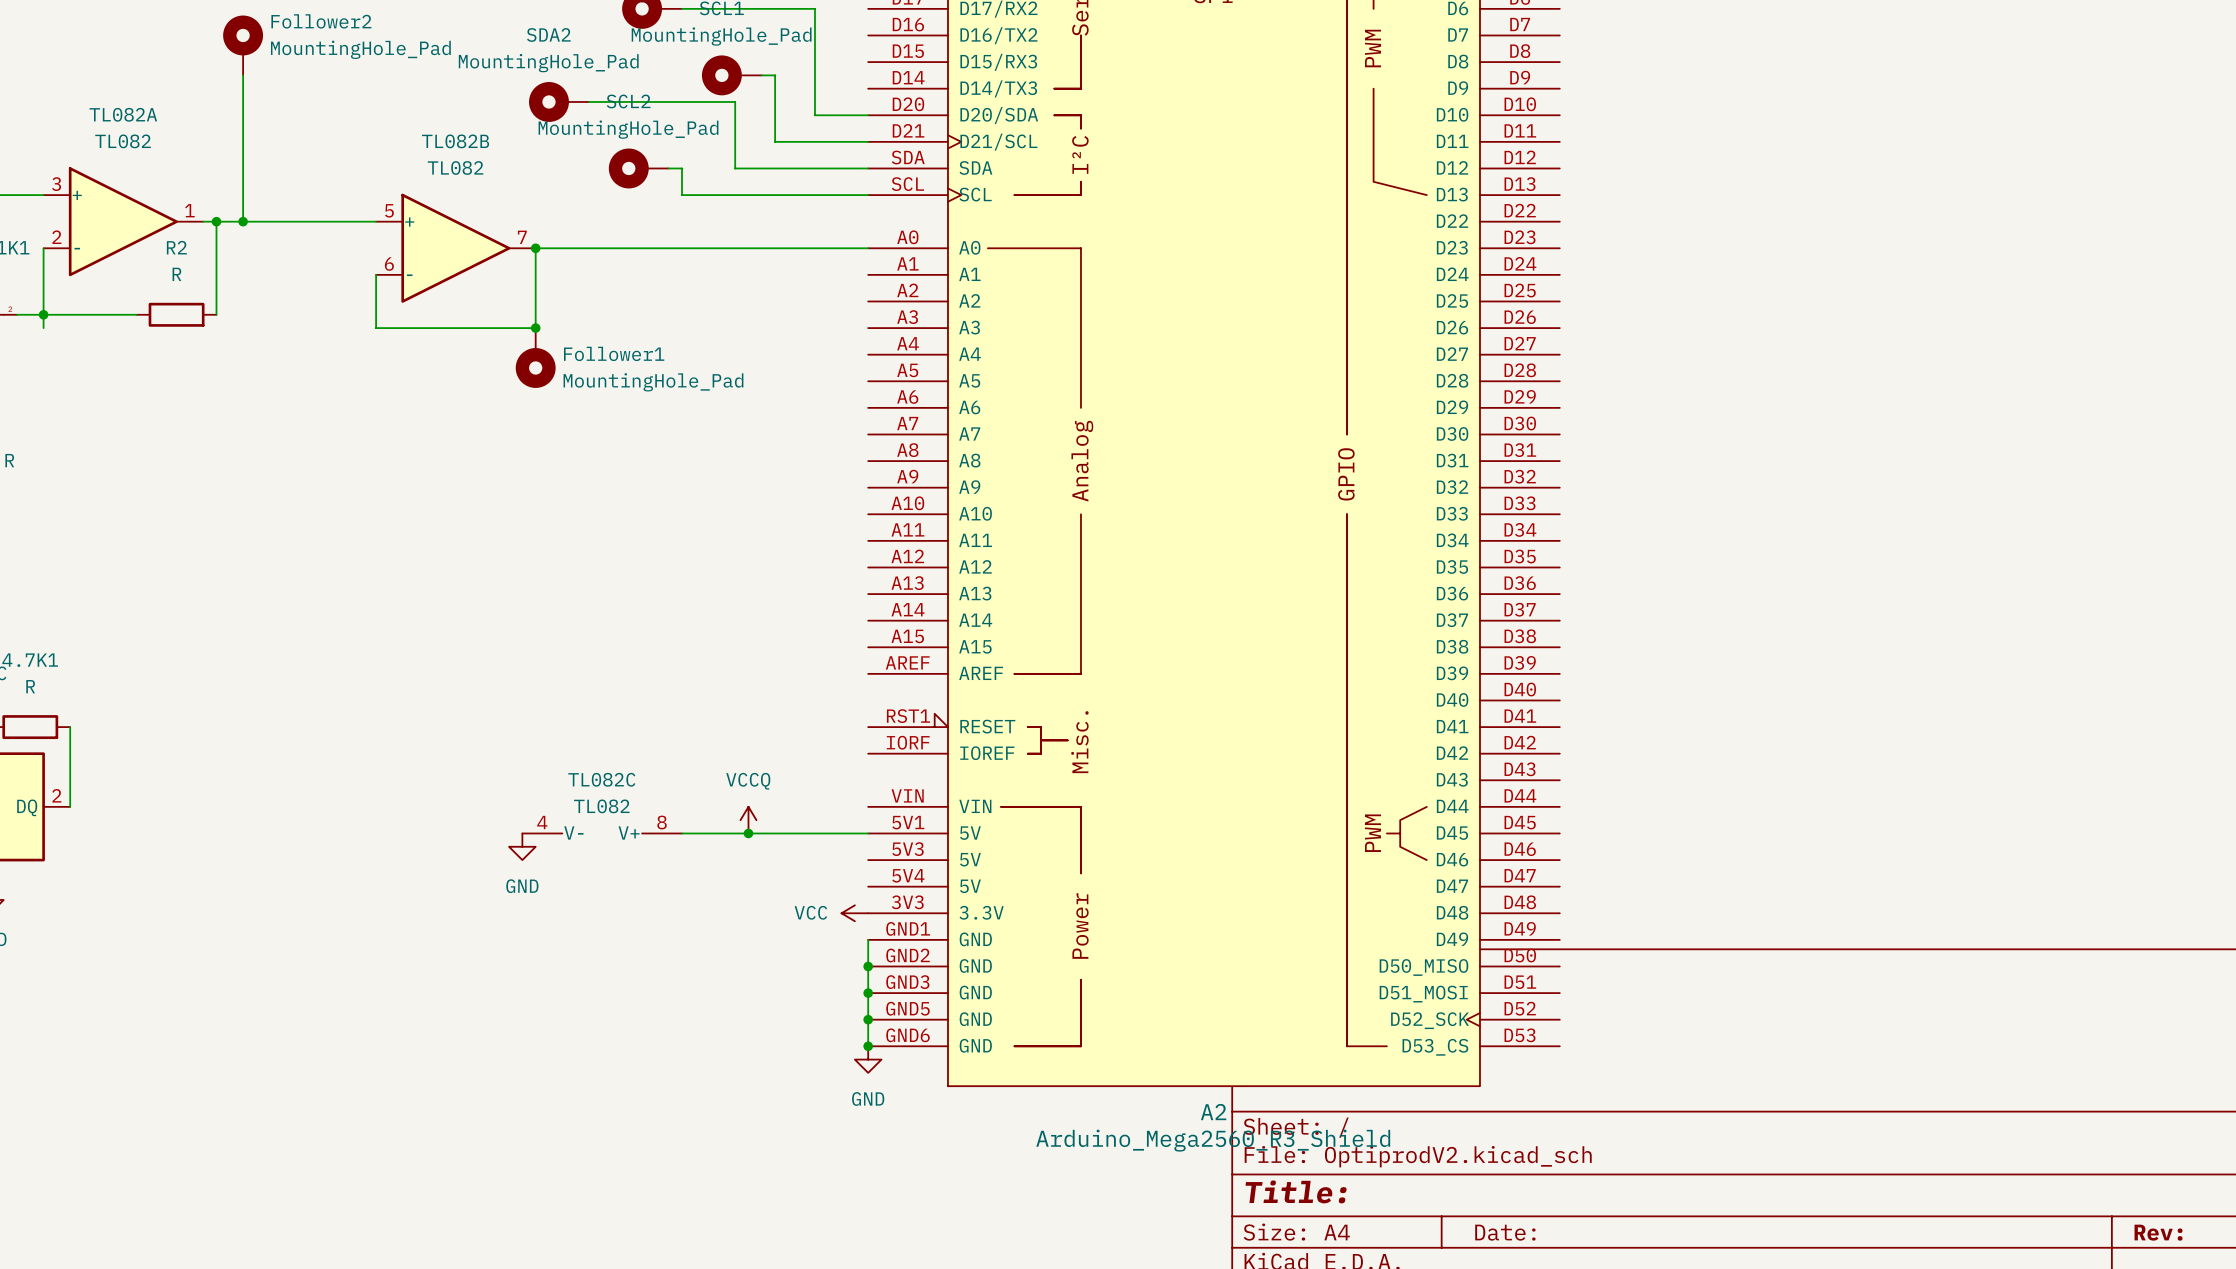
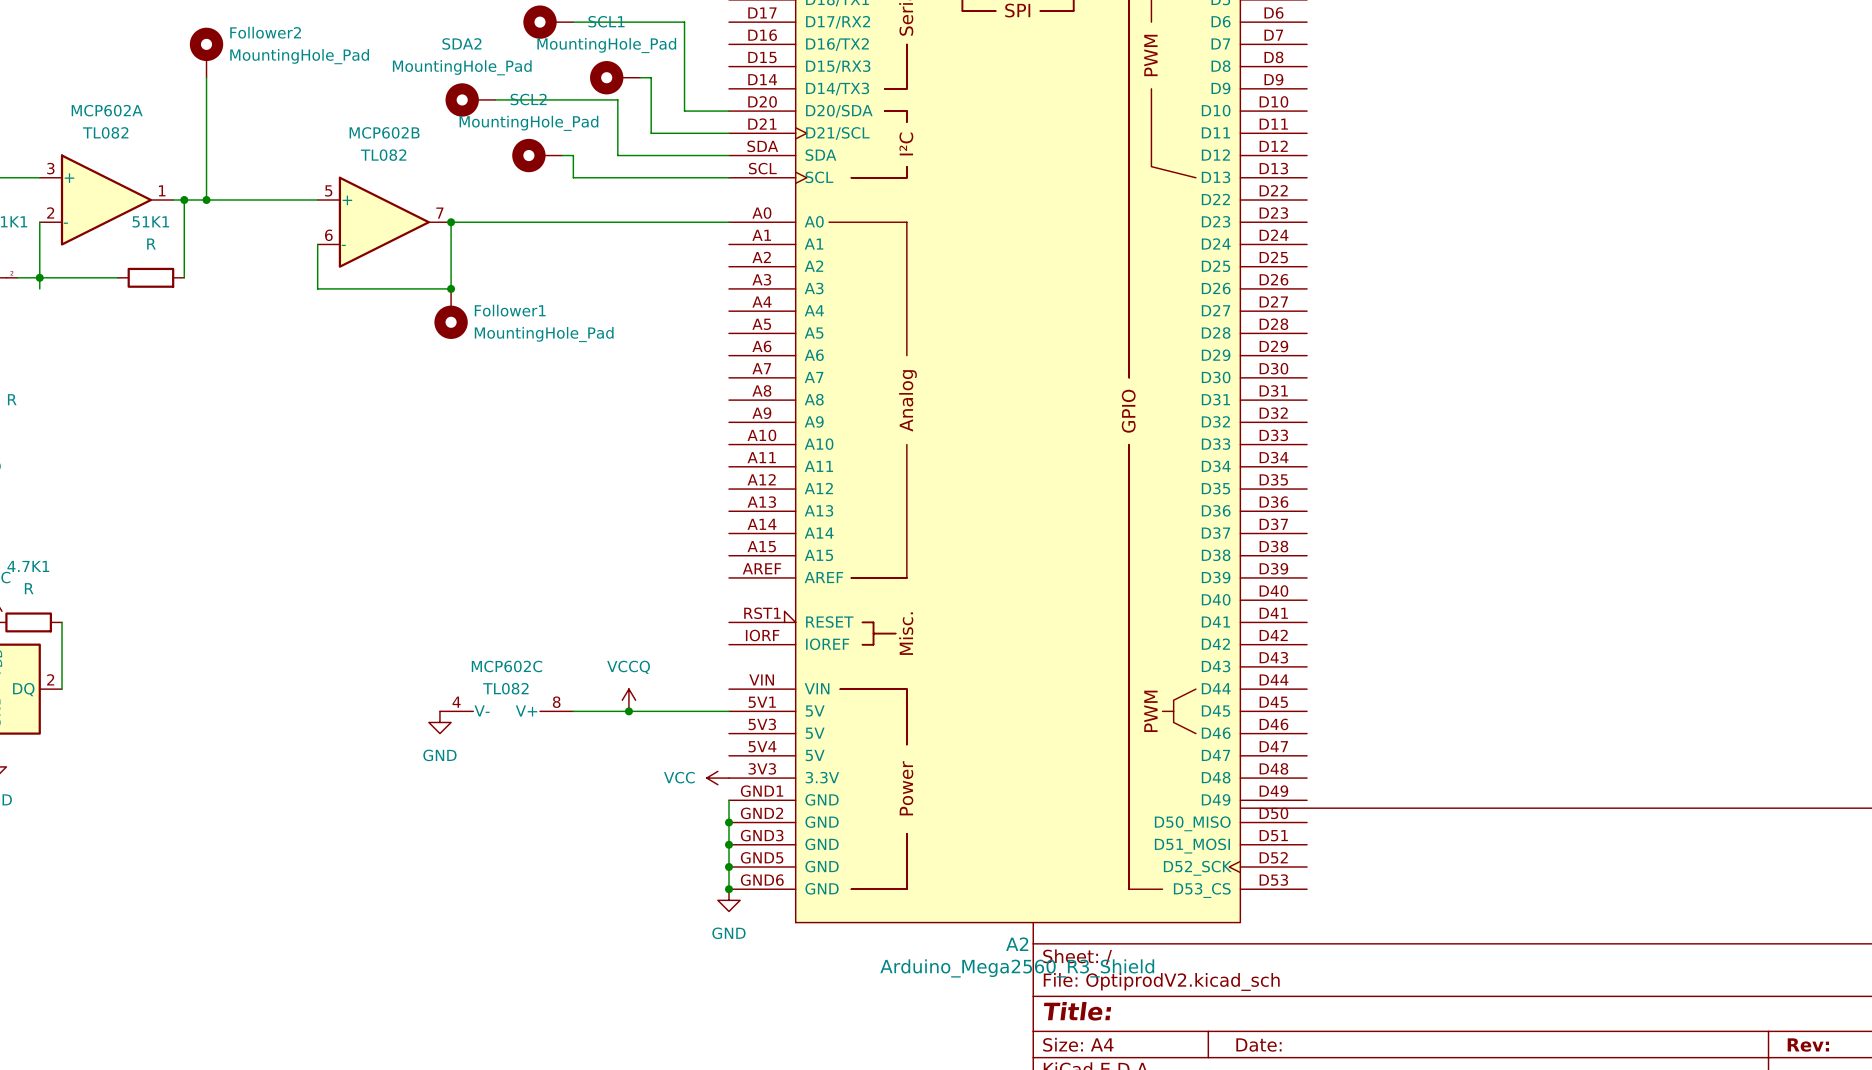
TL082A name: TL082A (123, 114) -> MCP602A (107, 110)
TL082B name: TL082B (455, 141) -> MCP602B (384, 132)
R2 name: R2 (176, 247) -> 51K1 (150, 221)
TL082C name: TL082C (601, 779) -> MCP602C (507, 666)

